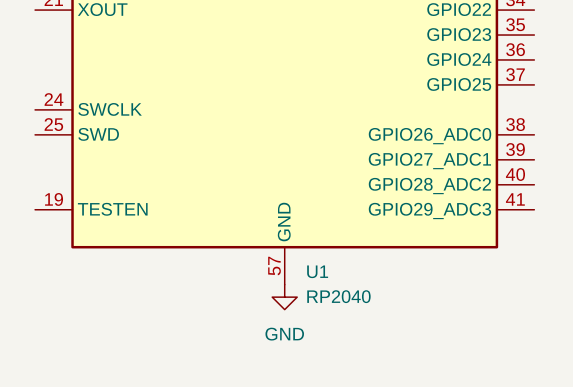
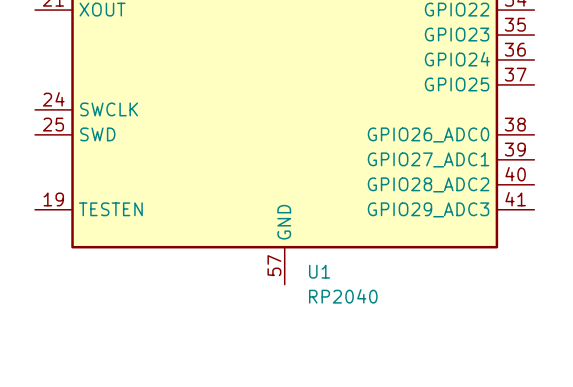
power symbol: GND (284, 297) -> none

